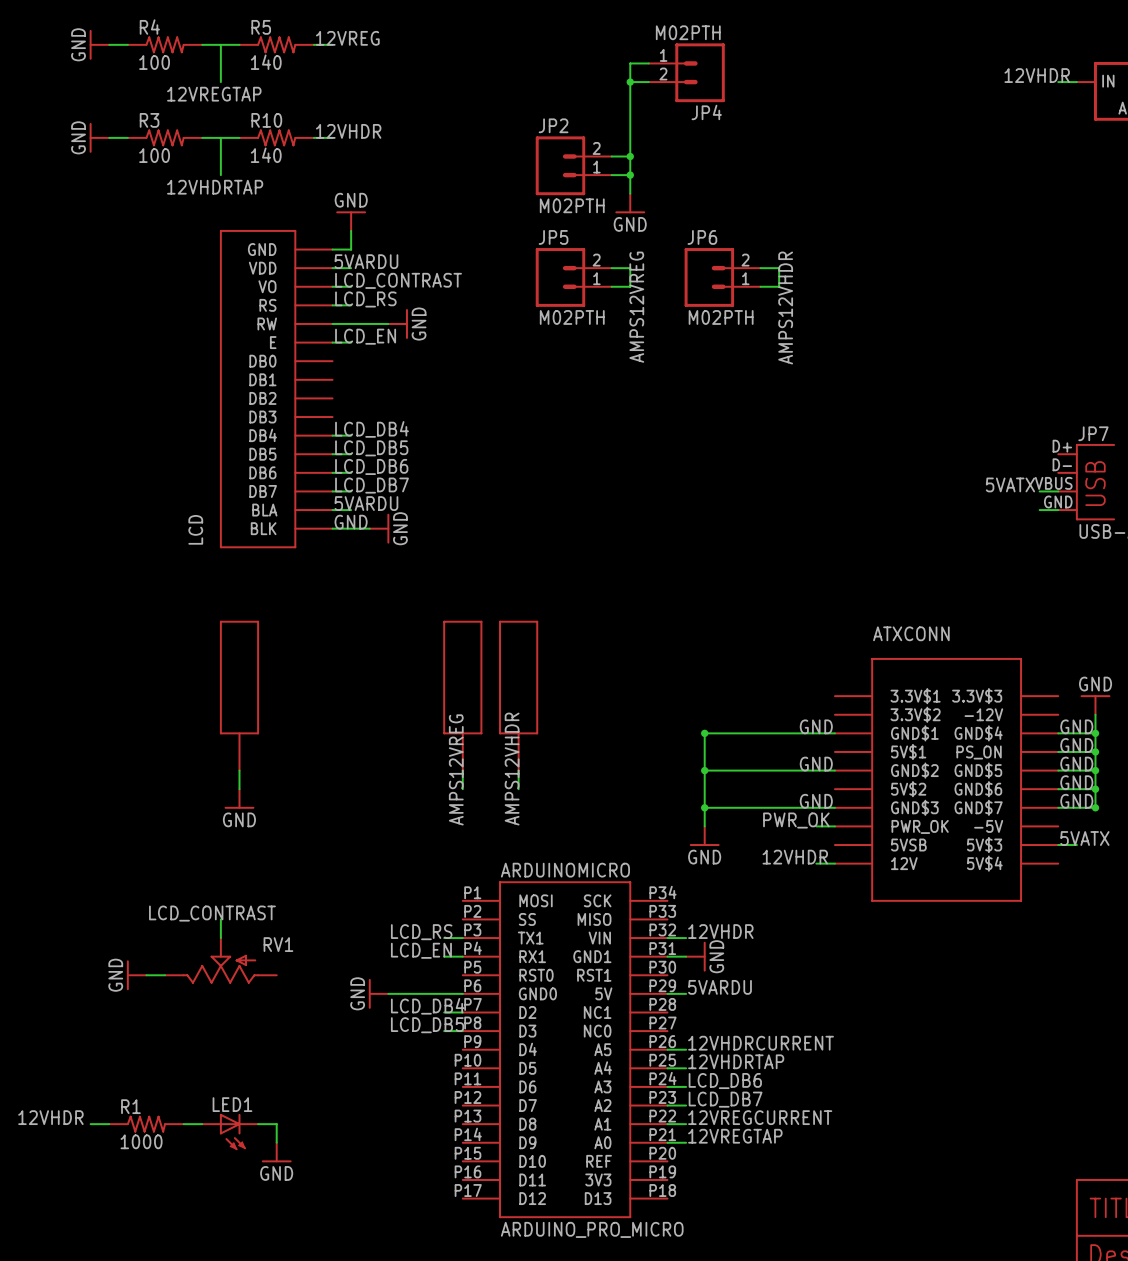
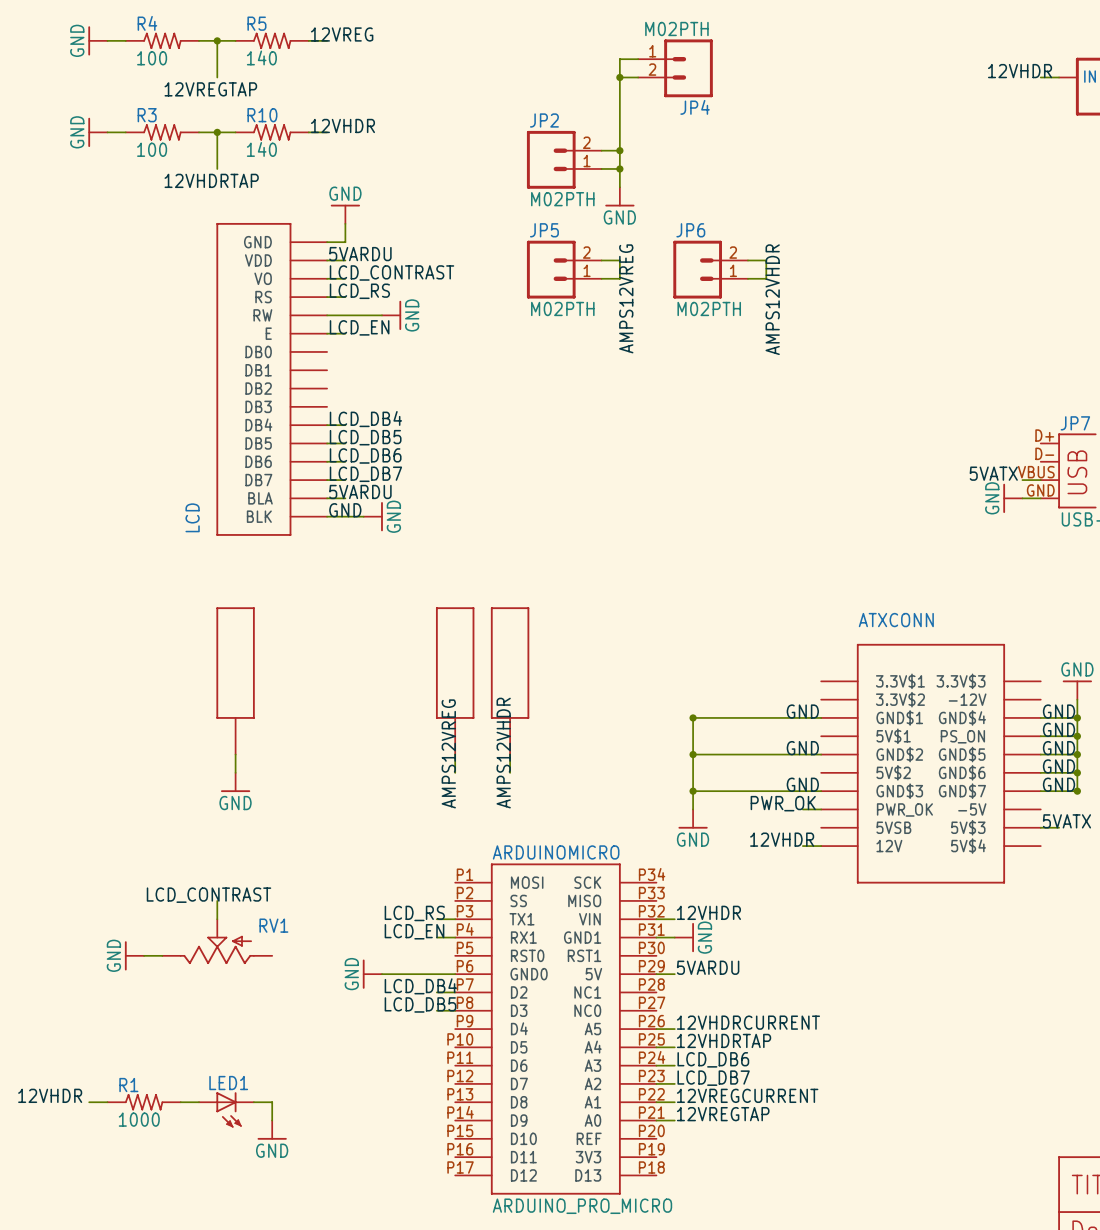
junction: none -> (217, 40)
junction: none -> (217, 132)
power symbol: none -> GND (1012, 498)

